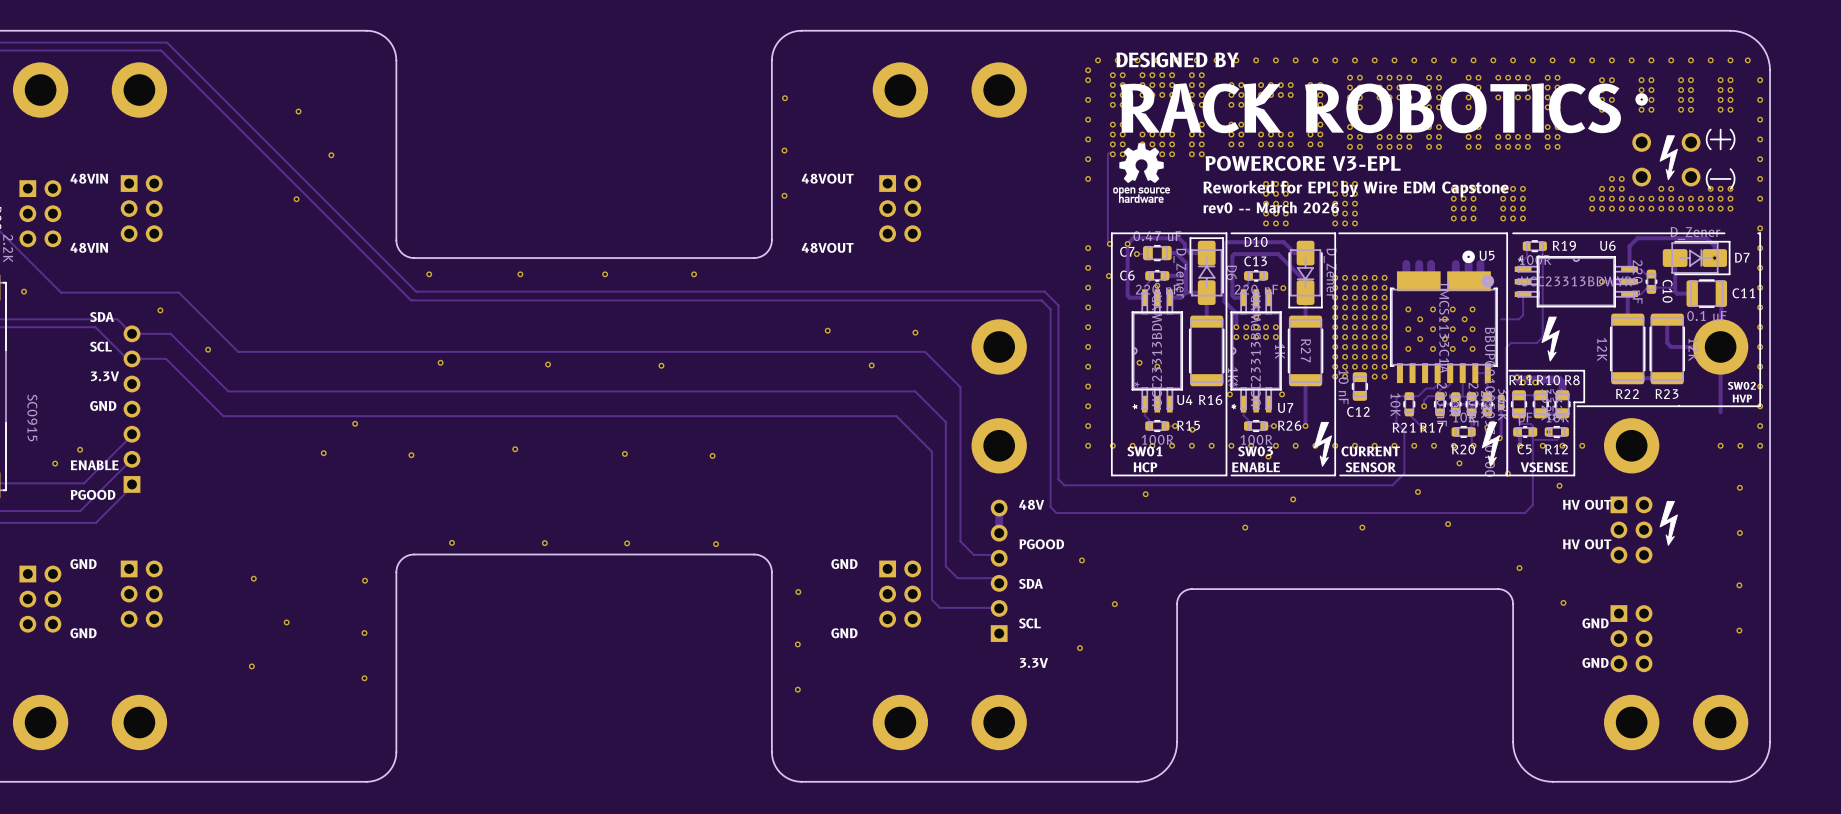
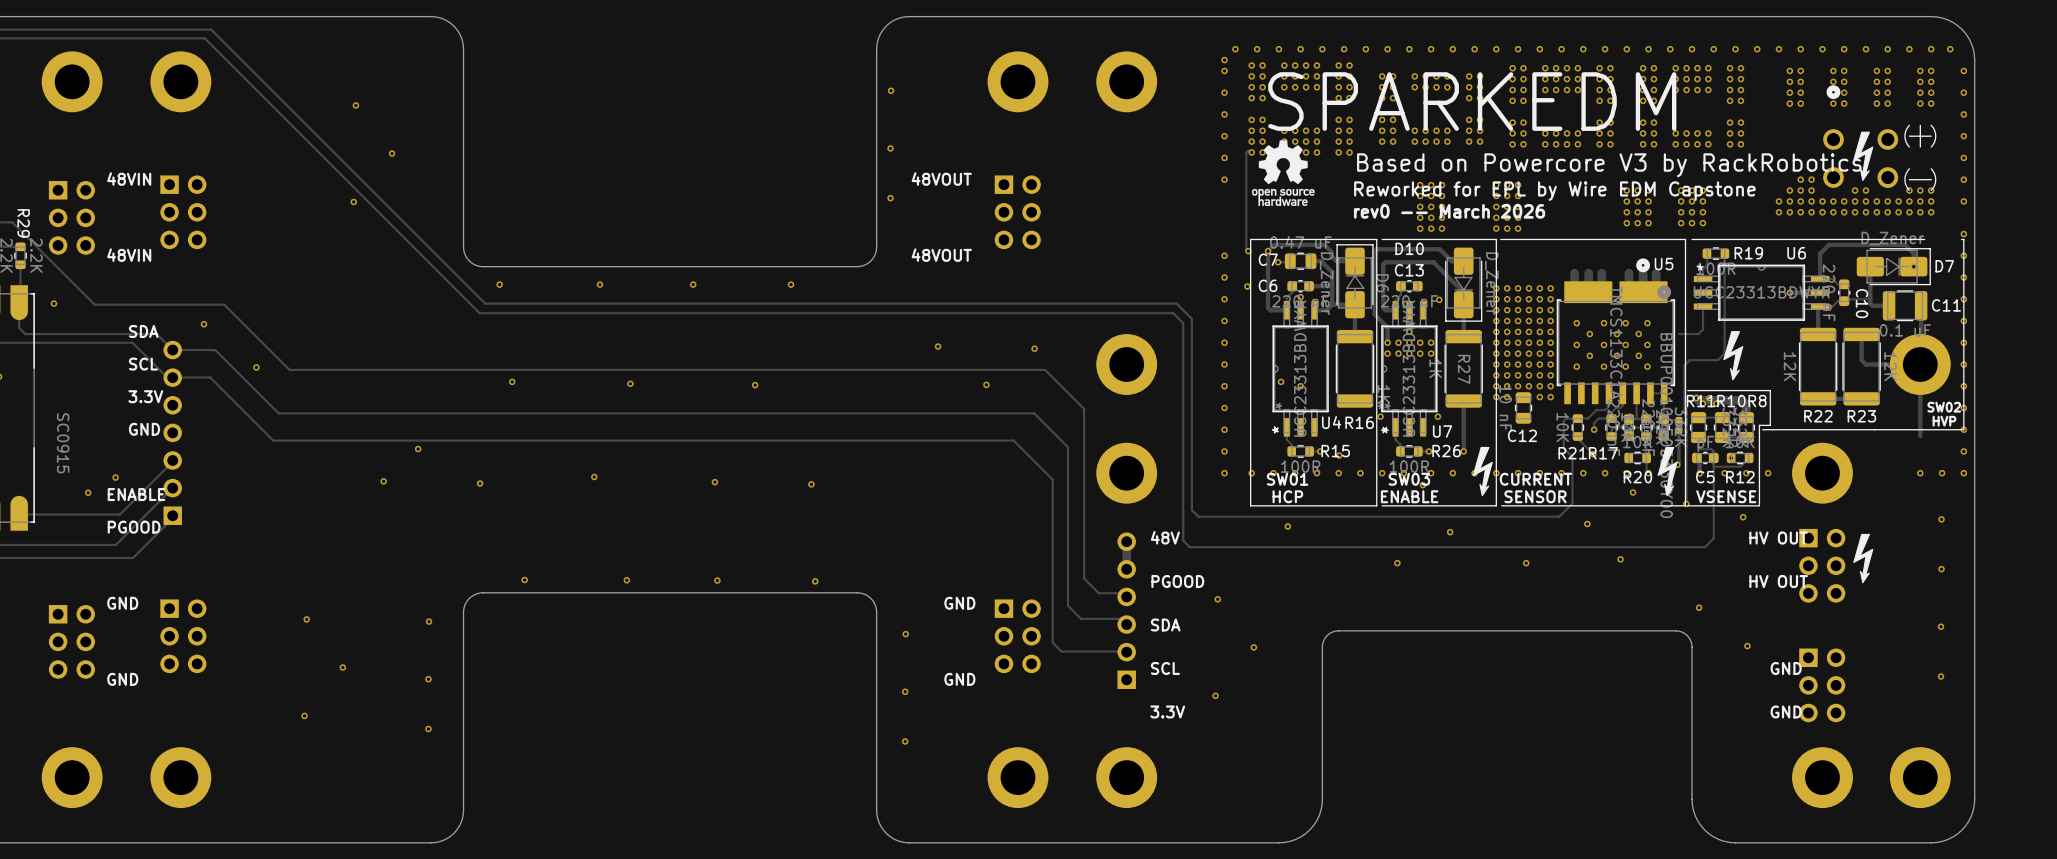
text: DESIGNED BY (1177, 59) -> none
text: RACK ROBOTICS (1370, 108) -> SPARKEDM (1472, 101)
text: POWERCORE V3-EPL (1303, 163) -> Based on Powercore V3 by RackRobotics (1609, 165)

